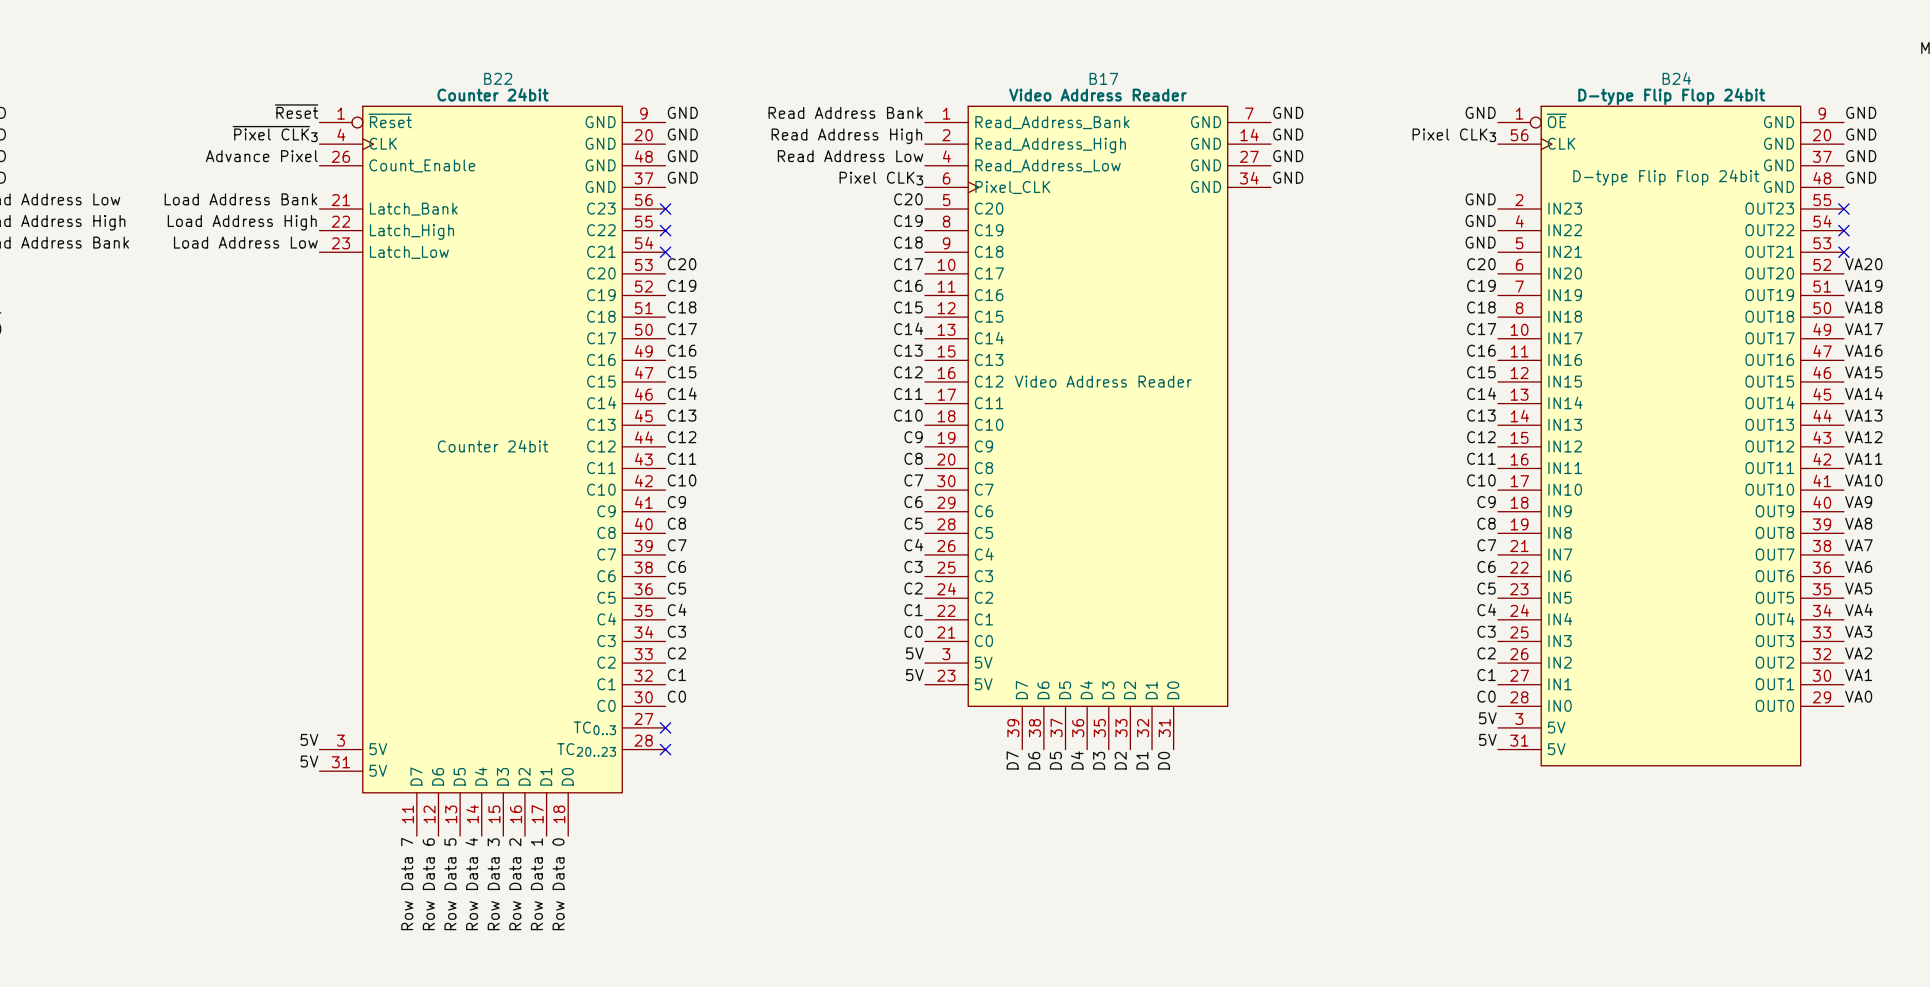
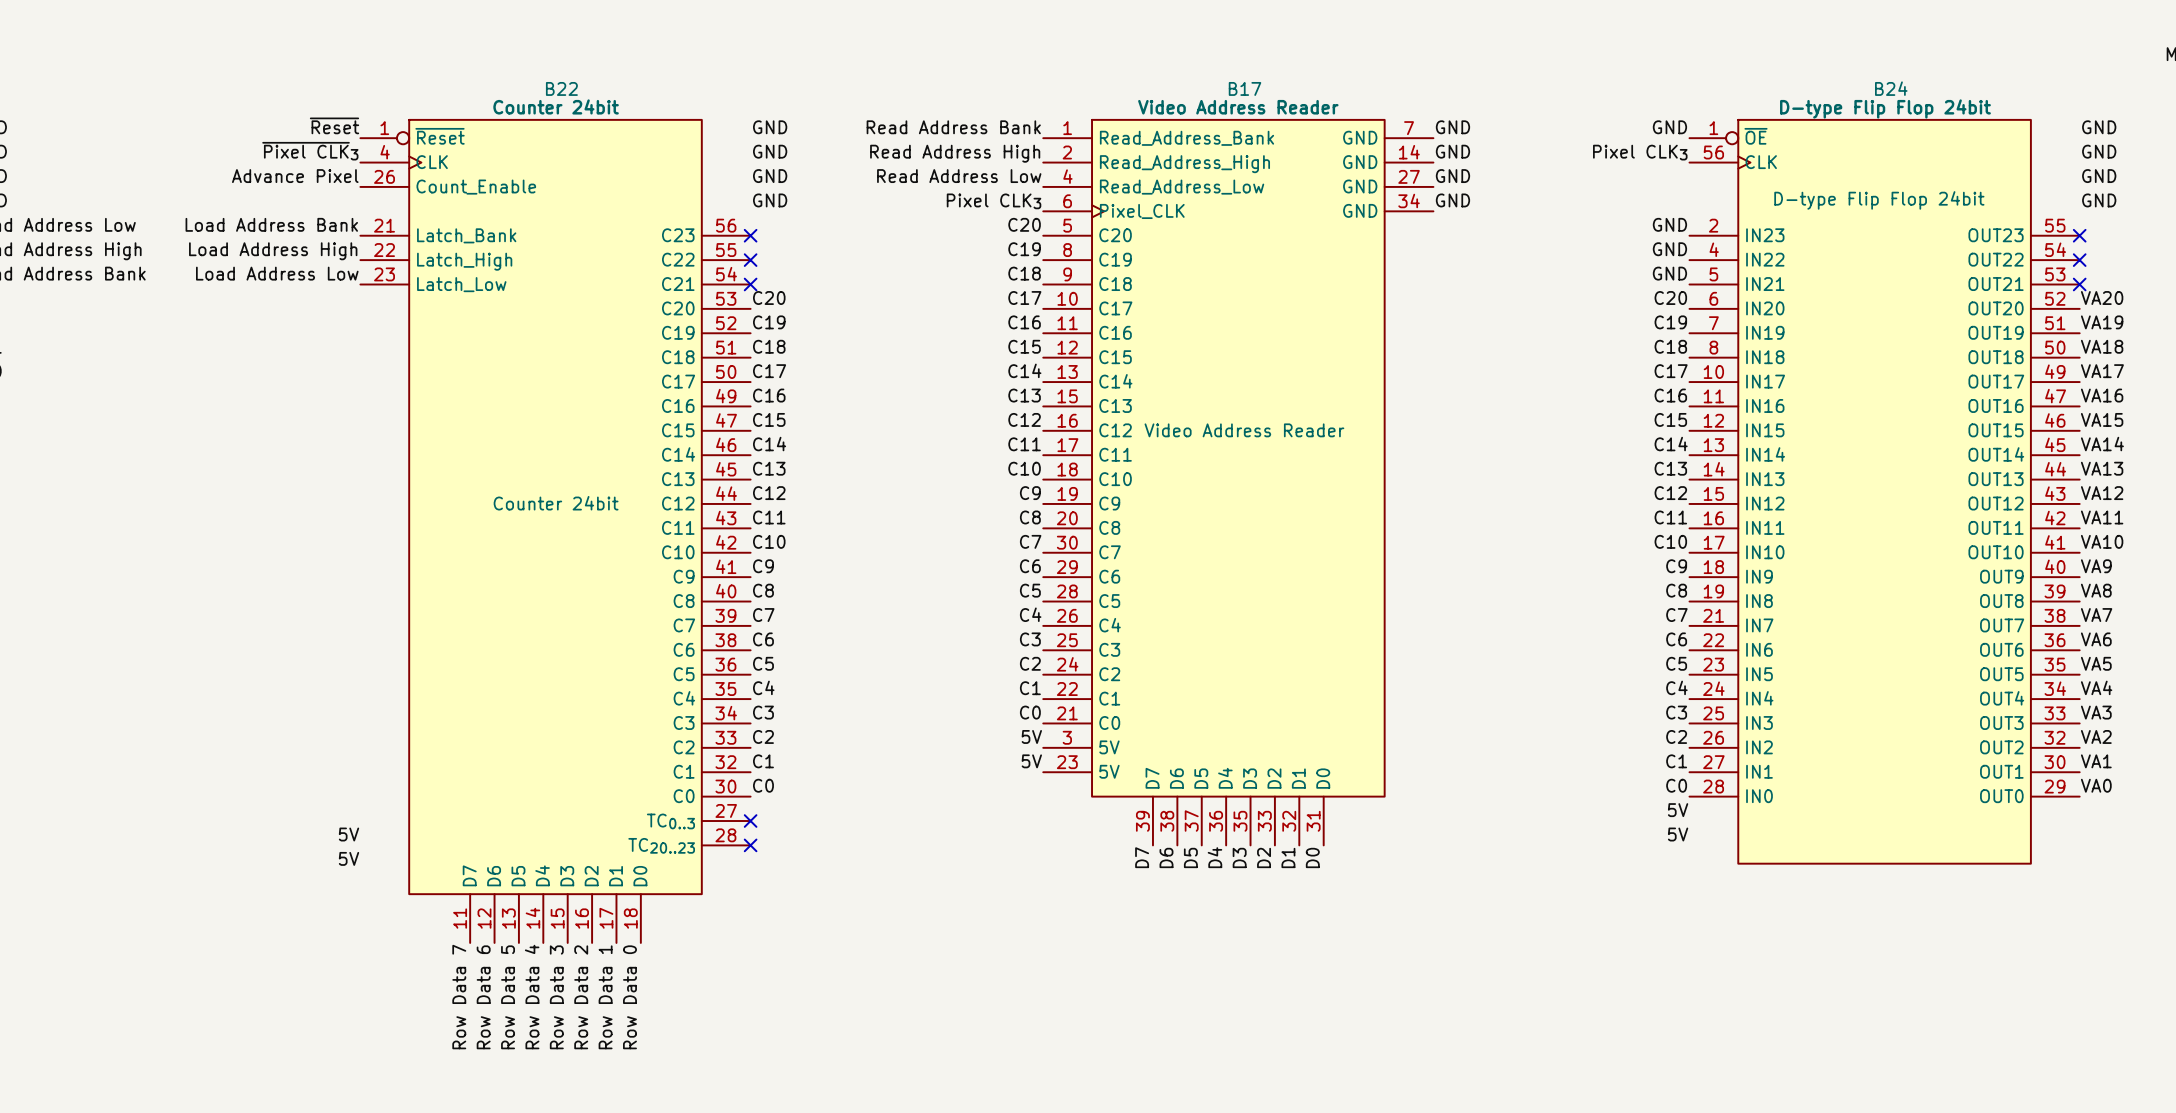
B22 symbol: [319, 105, 666, 837] -> [360, 119, 751, 943]
B24 symbol: [1497, 105, 1844, 767] -> [1689, 119, 2080, 865]

